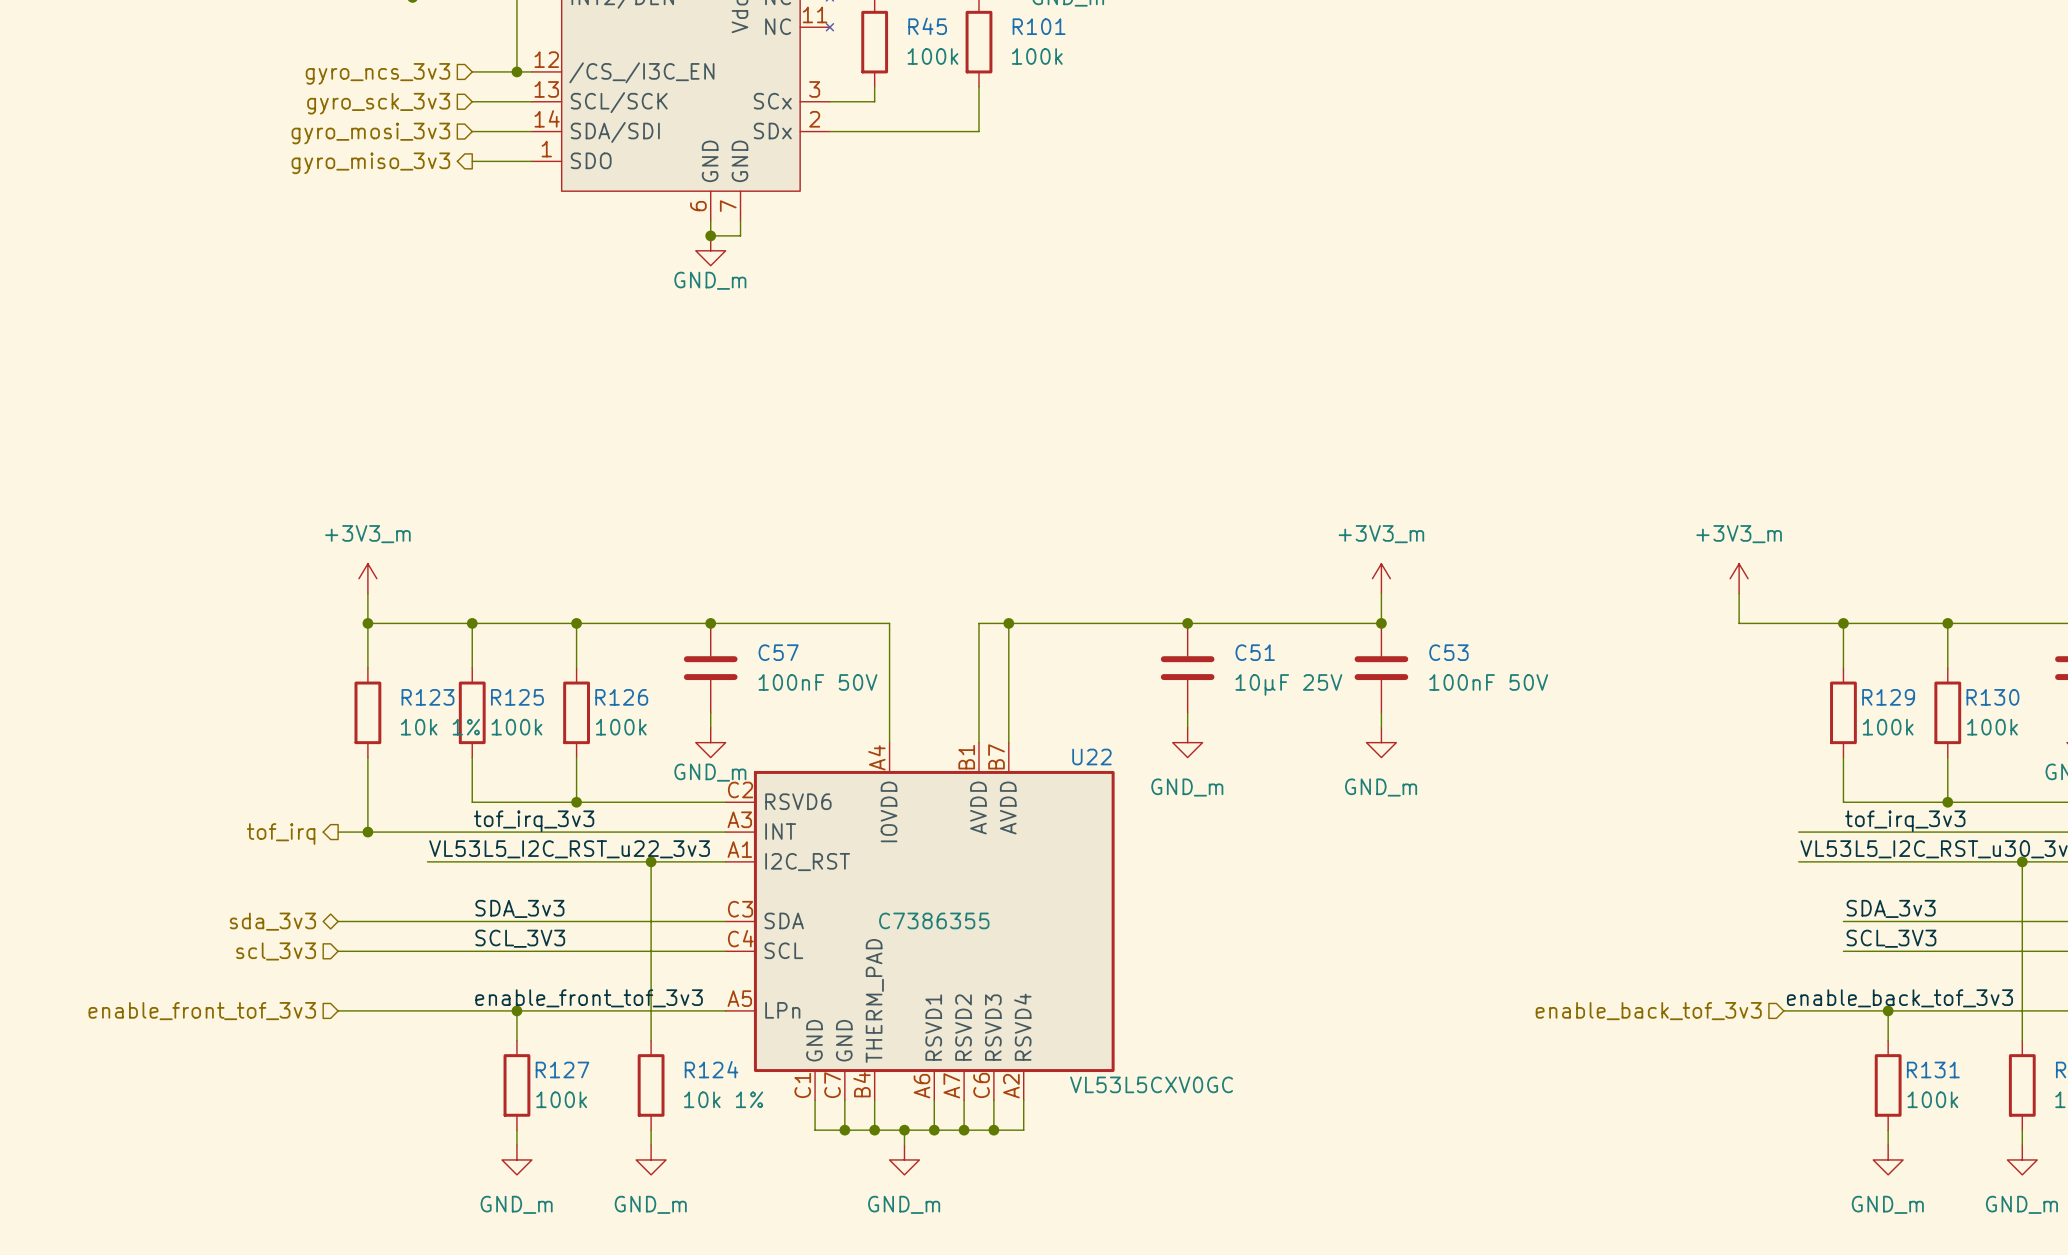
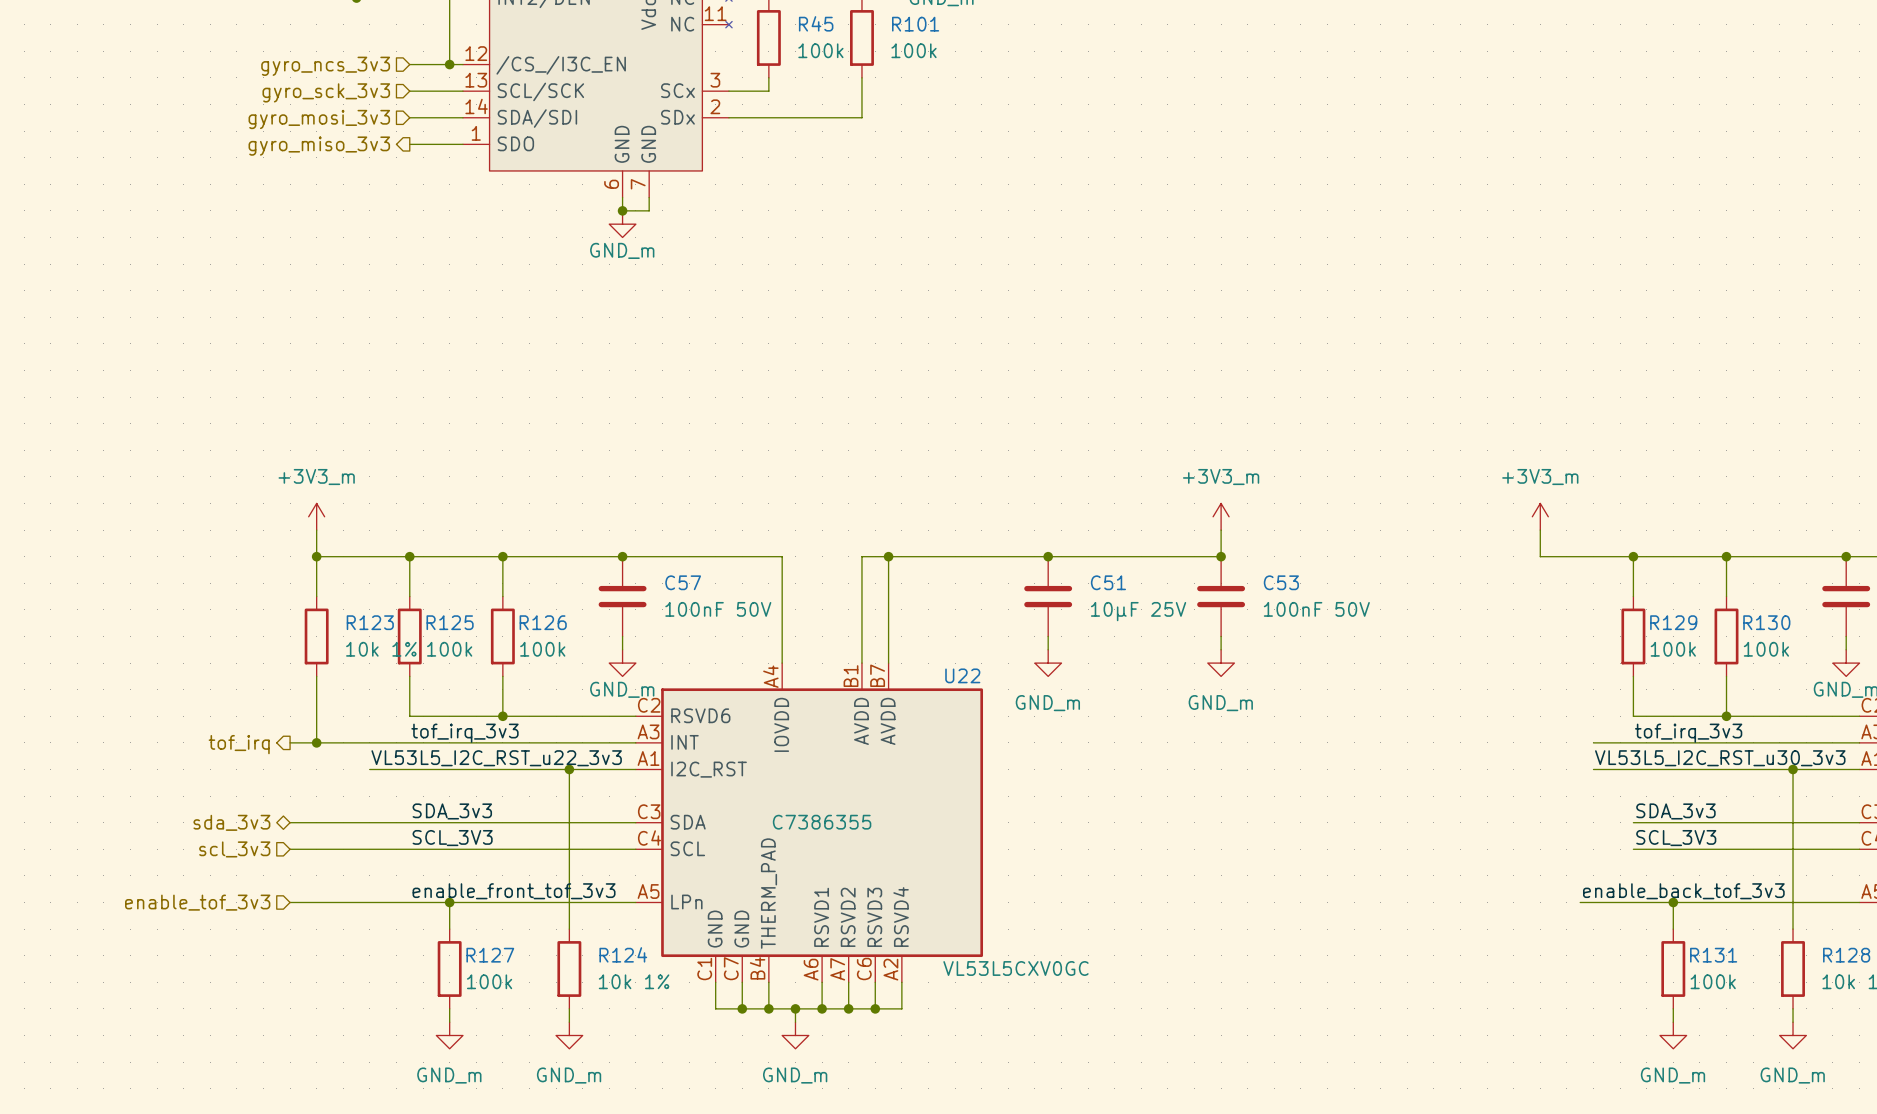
hierarchical label: enable_front_tof_3v3 (202, 1011) -> enable_tof_3v3 (197, 902)
hierarchical label: enable_back_tof_3v3 (1648, 1011) -> none

